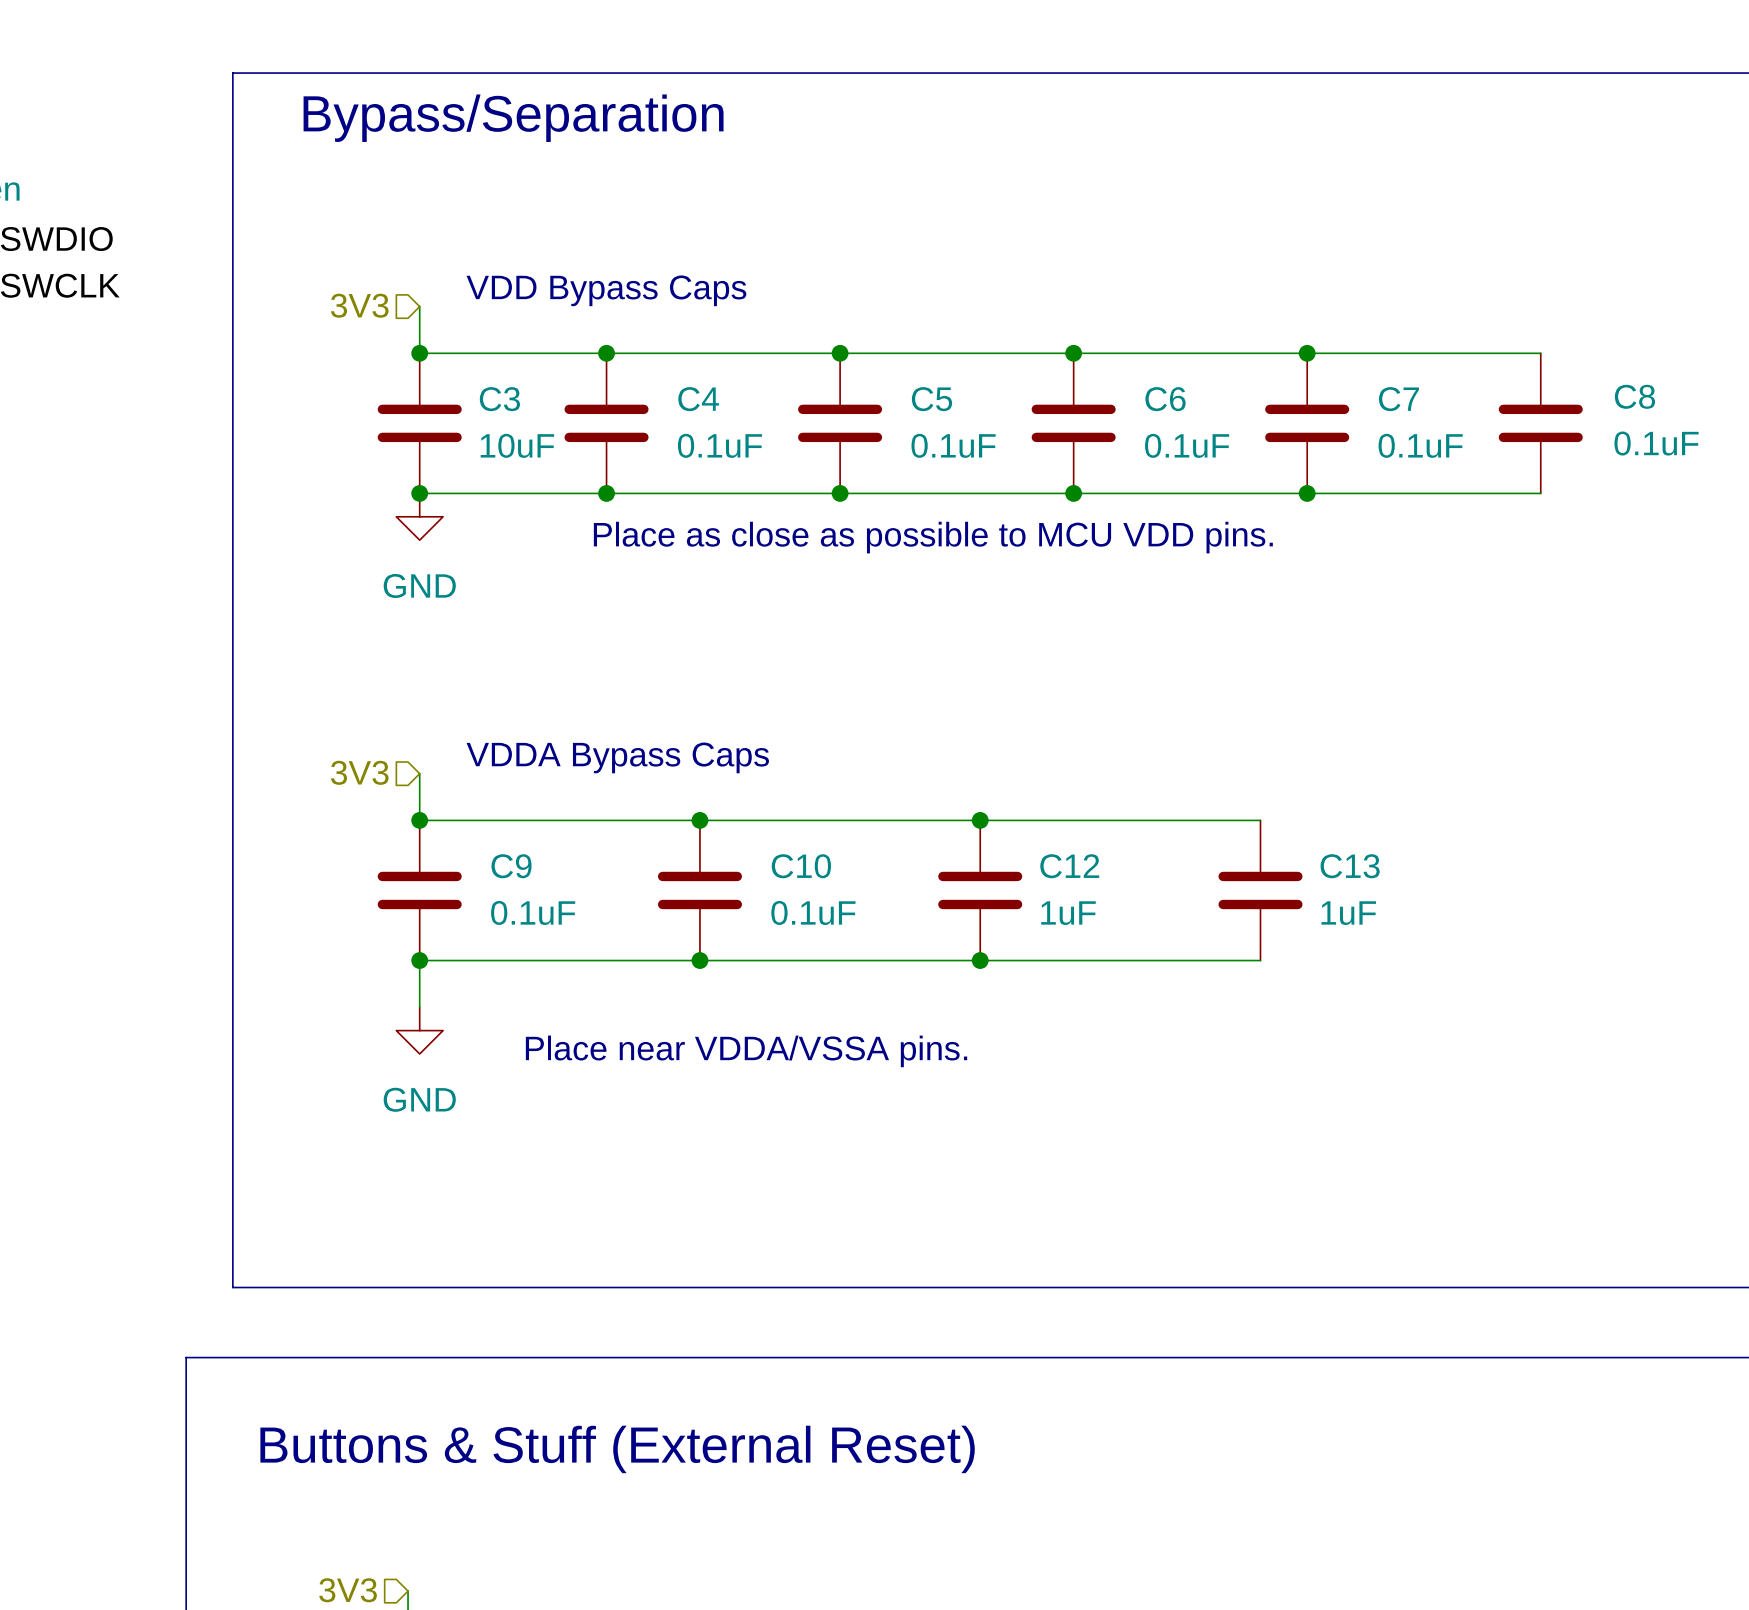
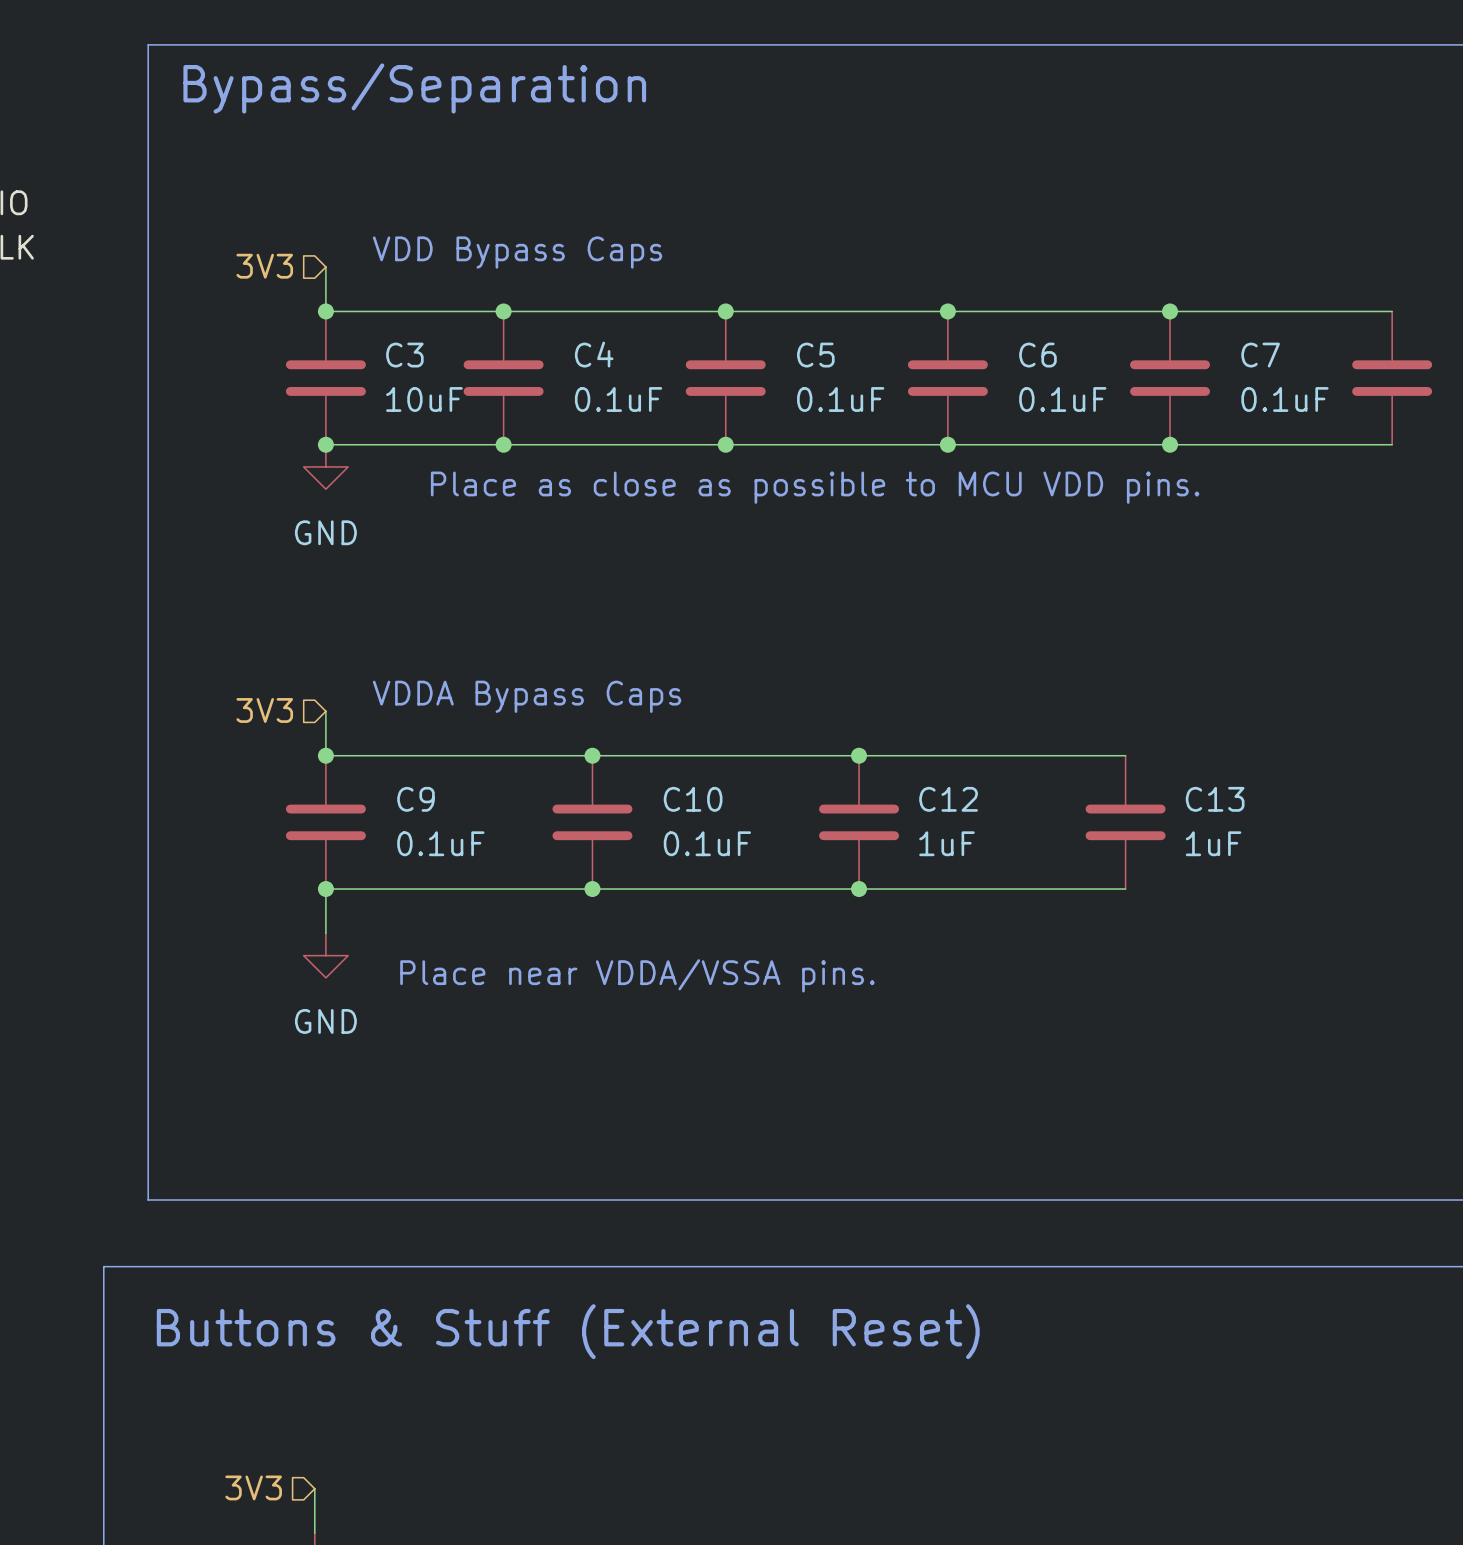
text position: Buttons & Stuff (External Reset) (617, 1449) -> Buttons & Stuff (External Reset) (568, 1331)

